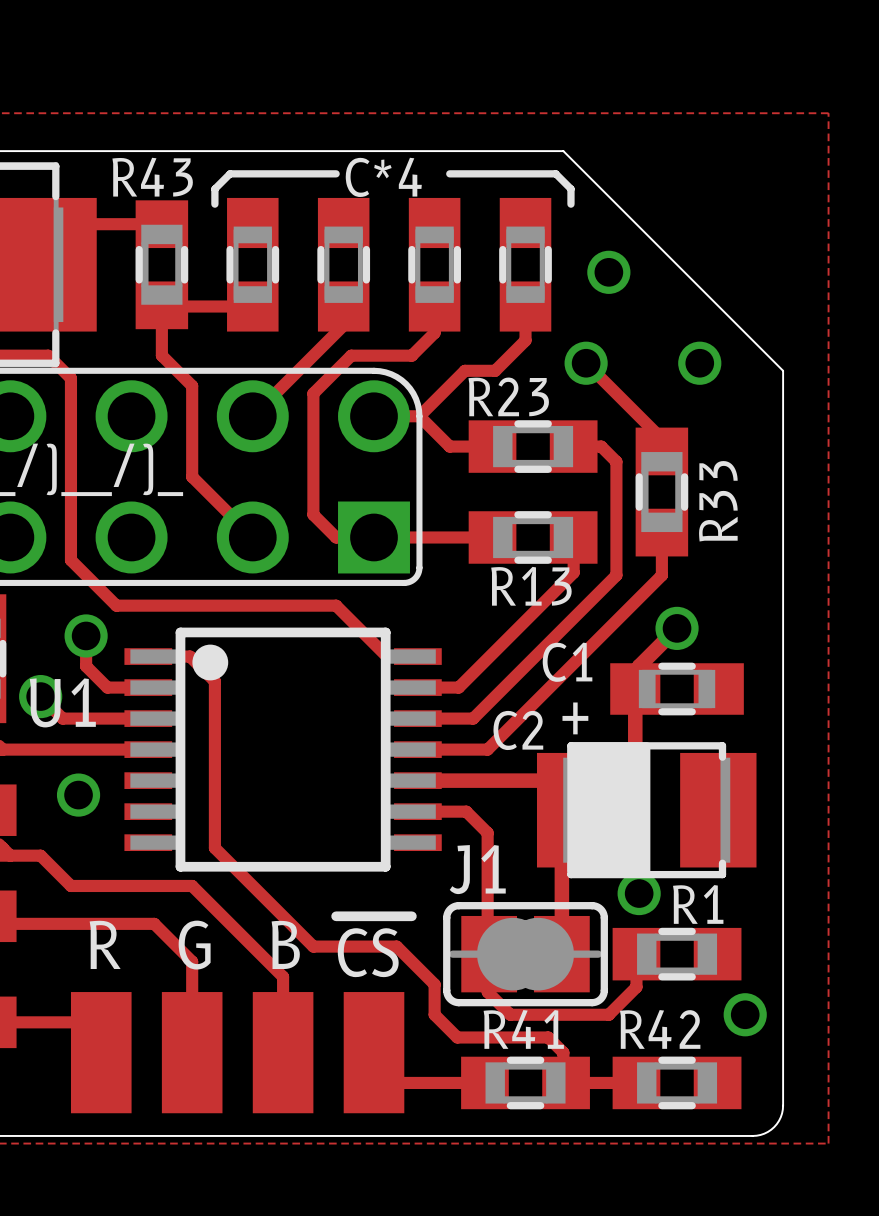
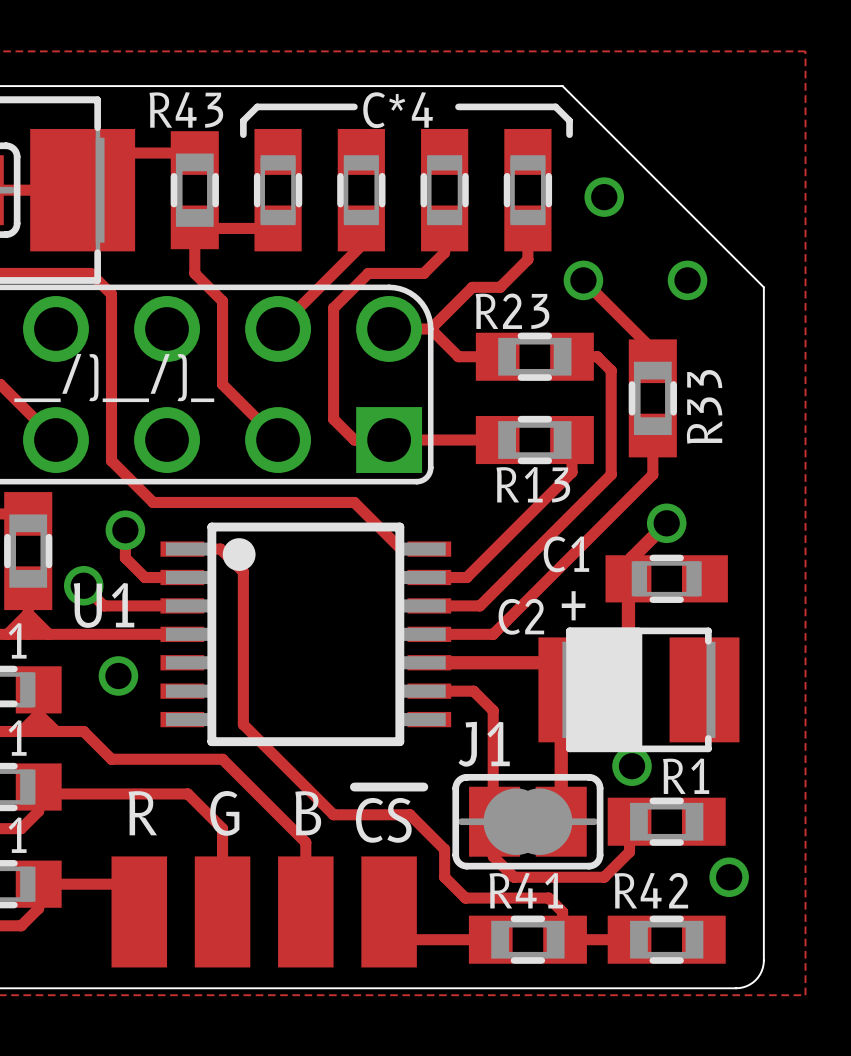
text position: U1 (62, 702) -> U1 (104, 605)

